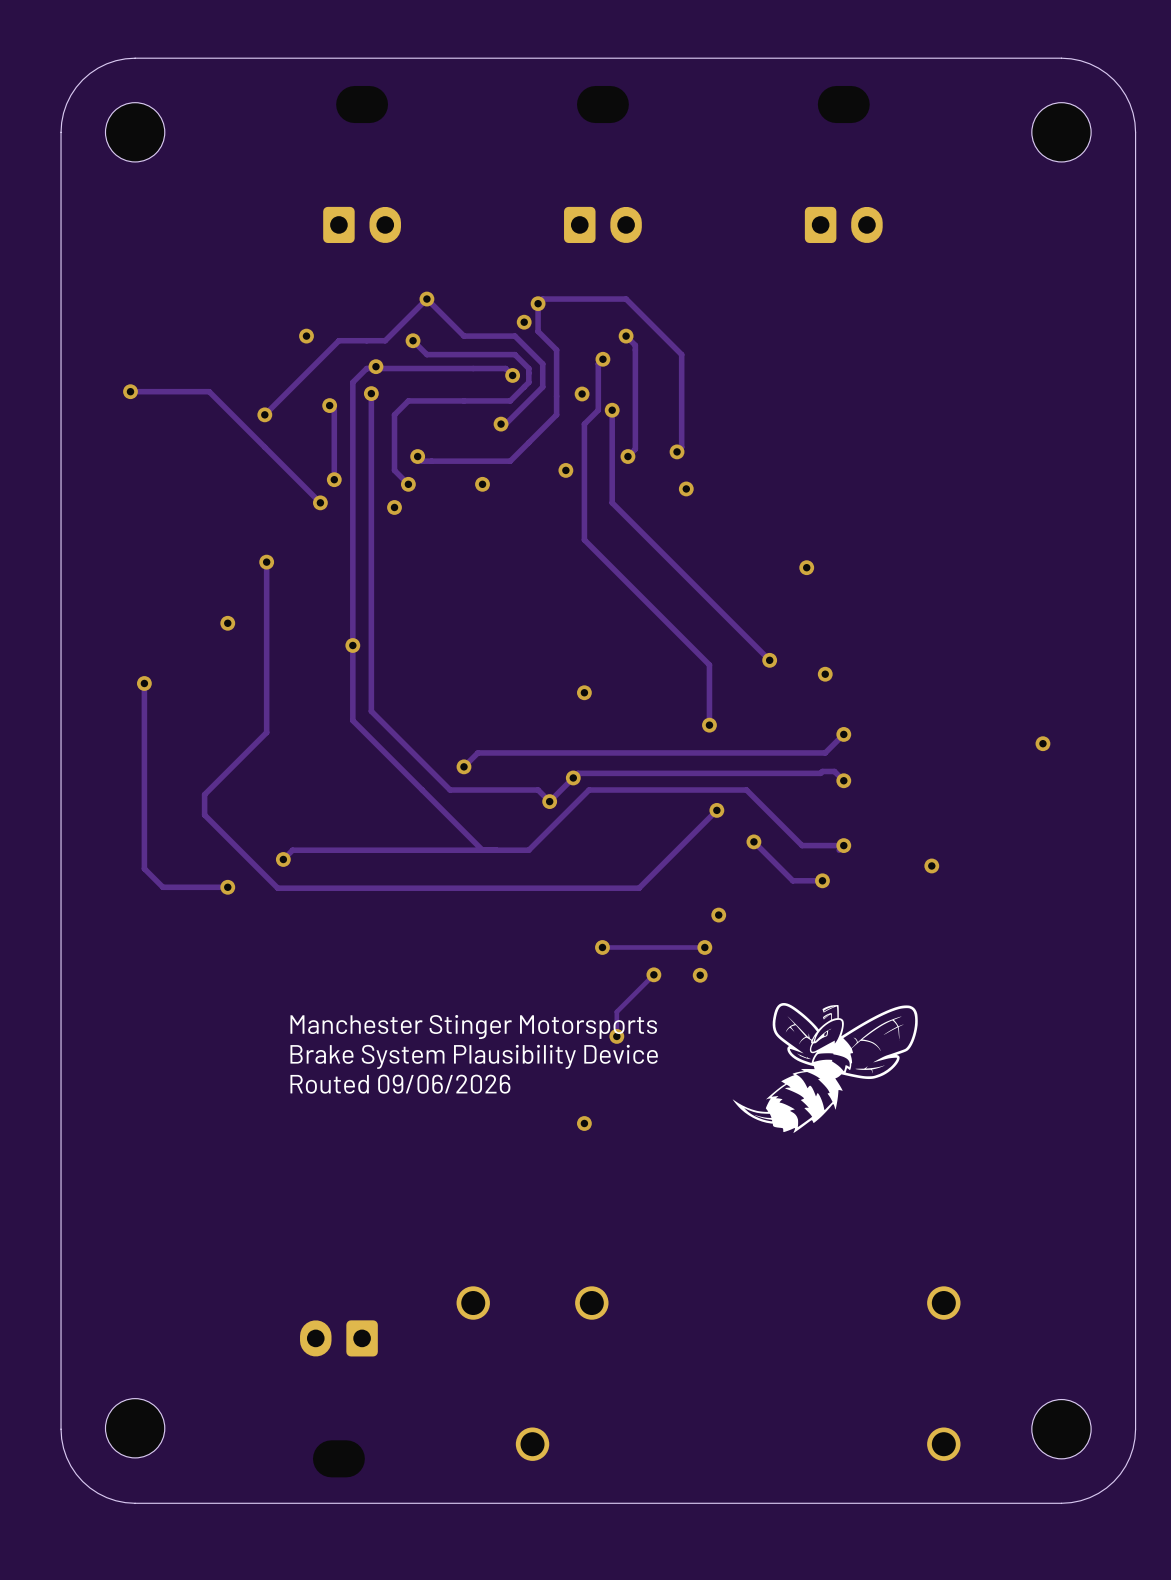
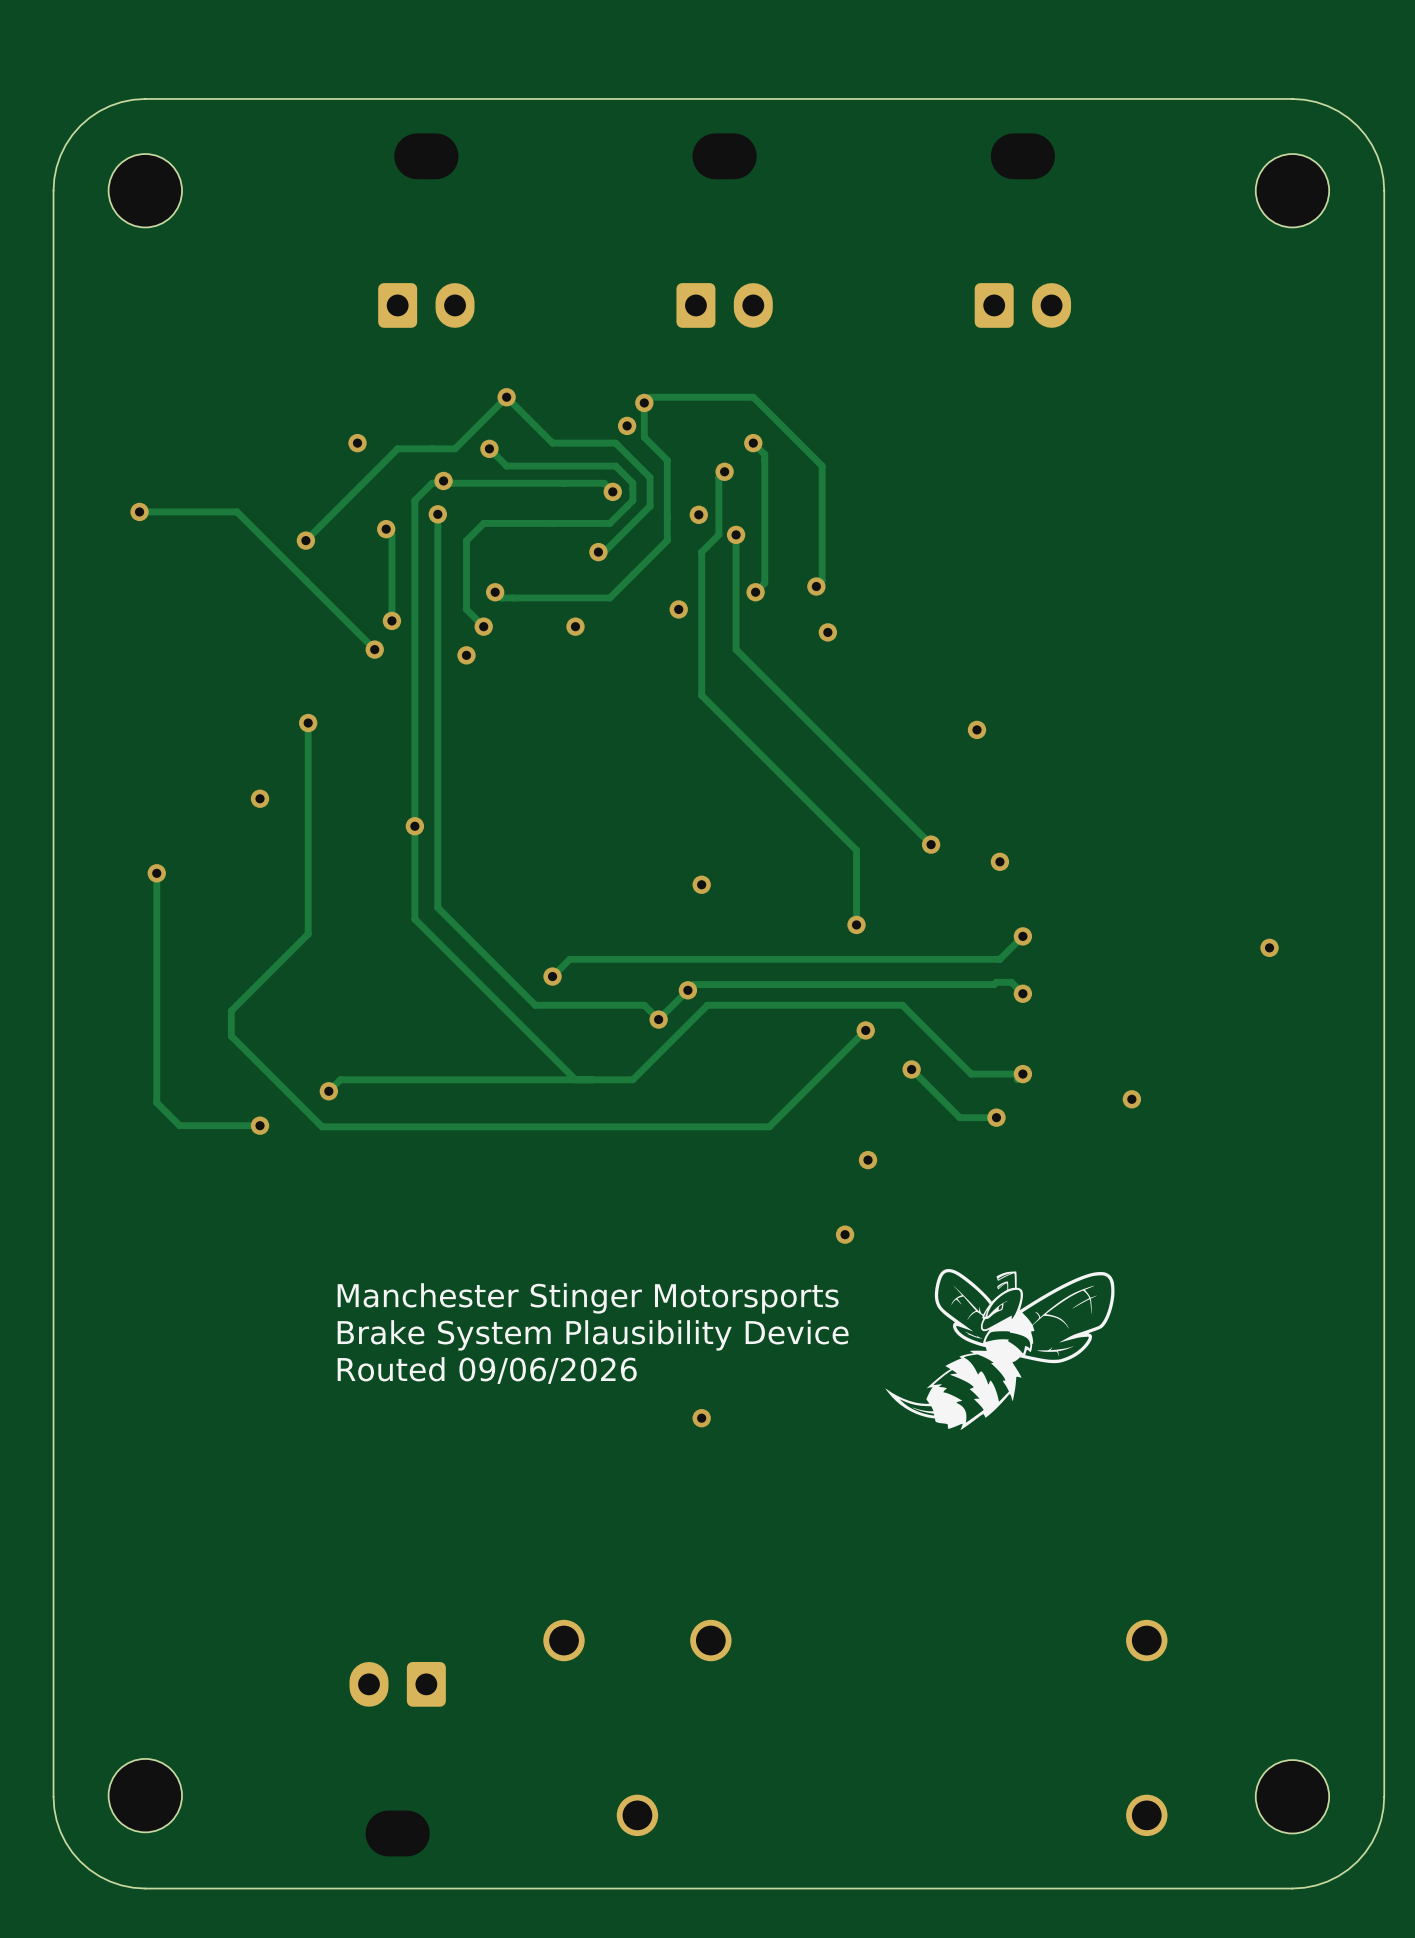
via: (602, 947) -> none
track: (704, 947) (602, 947) -> none
via: (704, 947) -> none
track: (653, 974) (616, 1011) (616, 1036) -> none
via: (653, 974) -> none
via: (616, 1036) -> none

